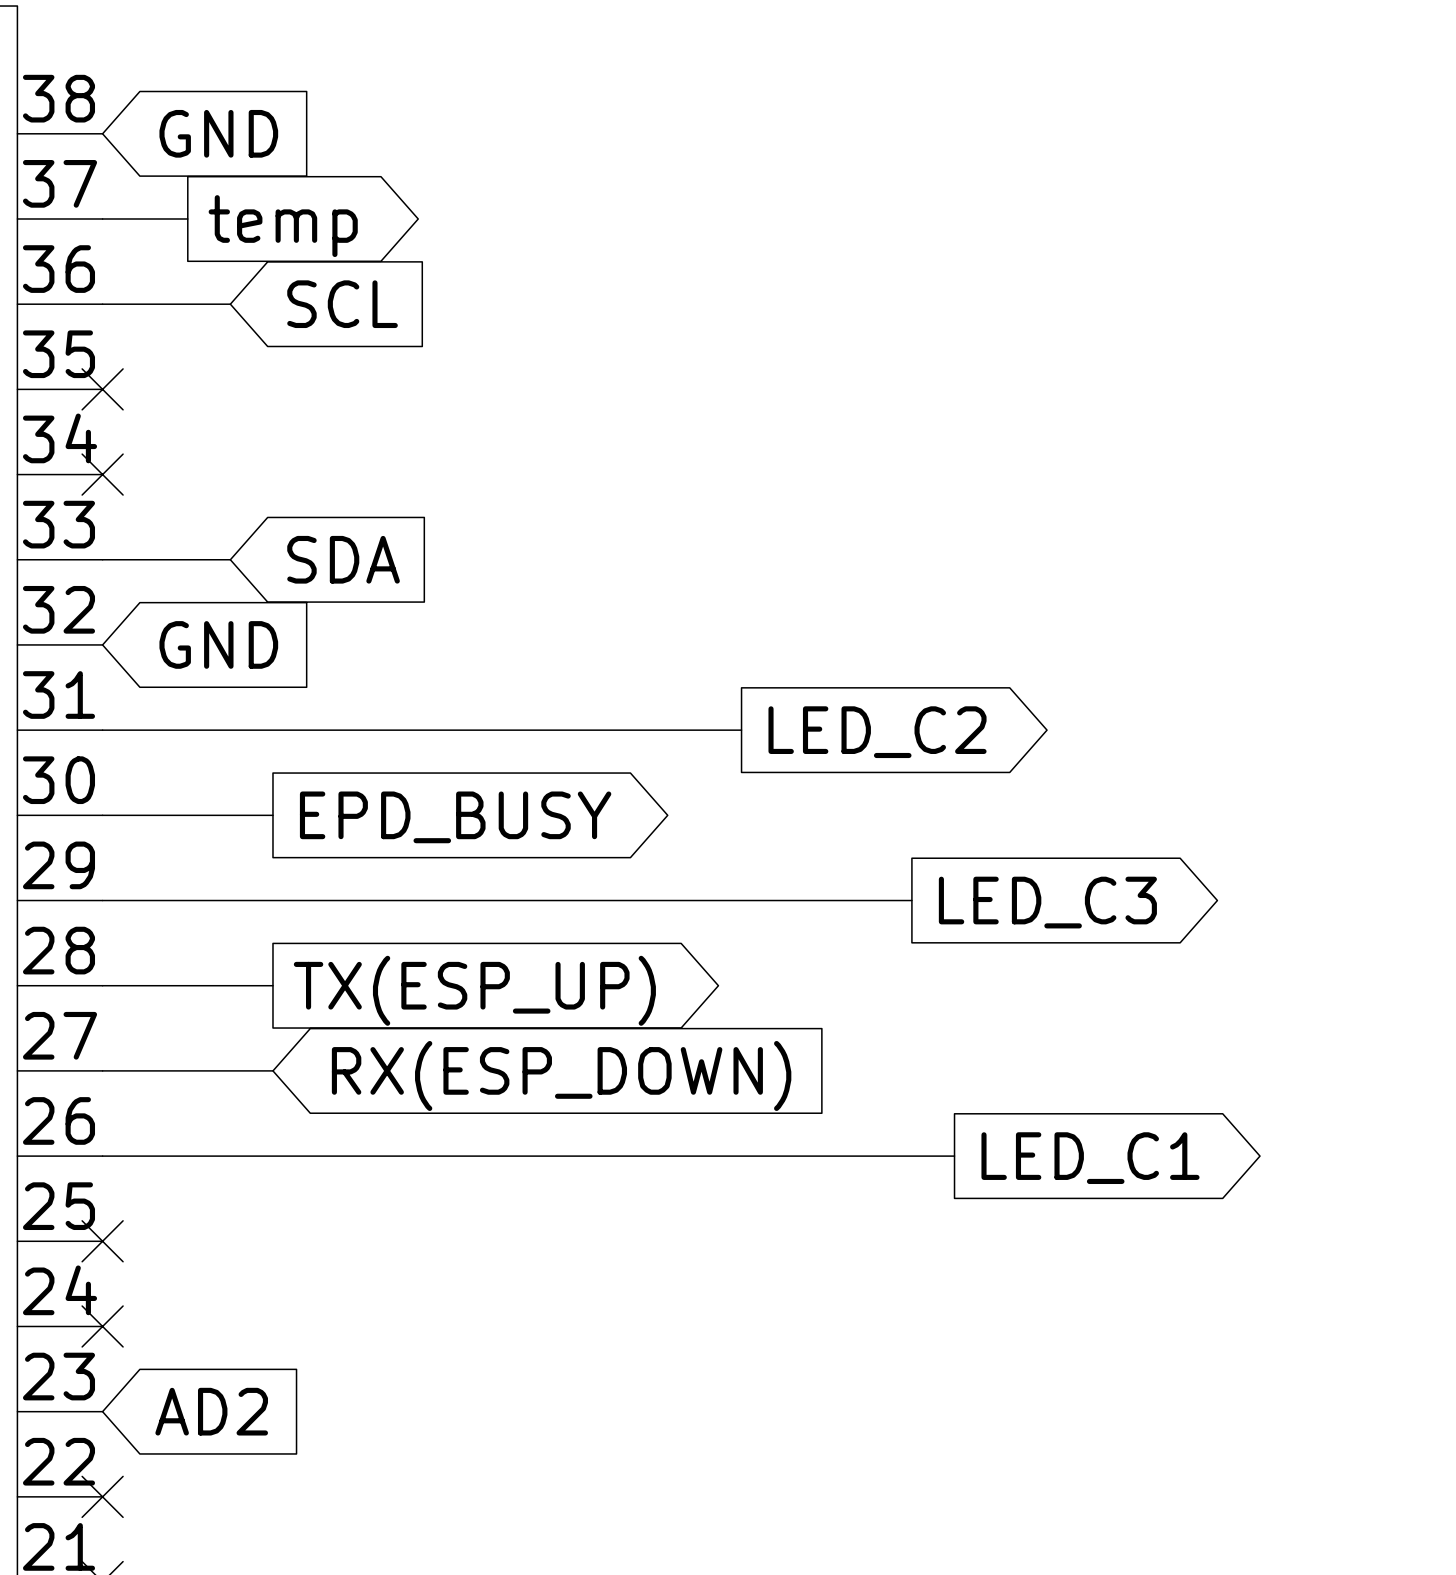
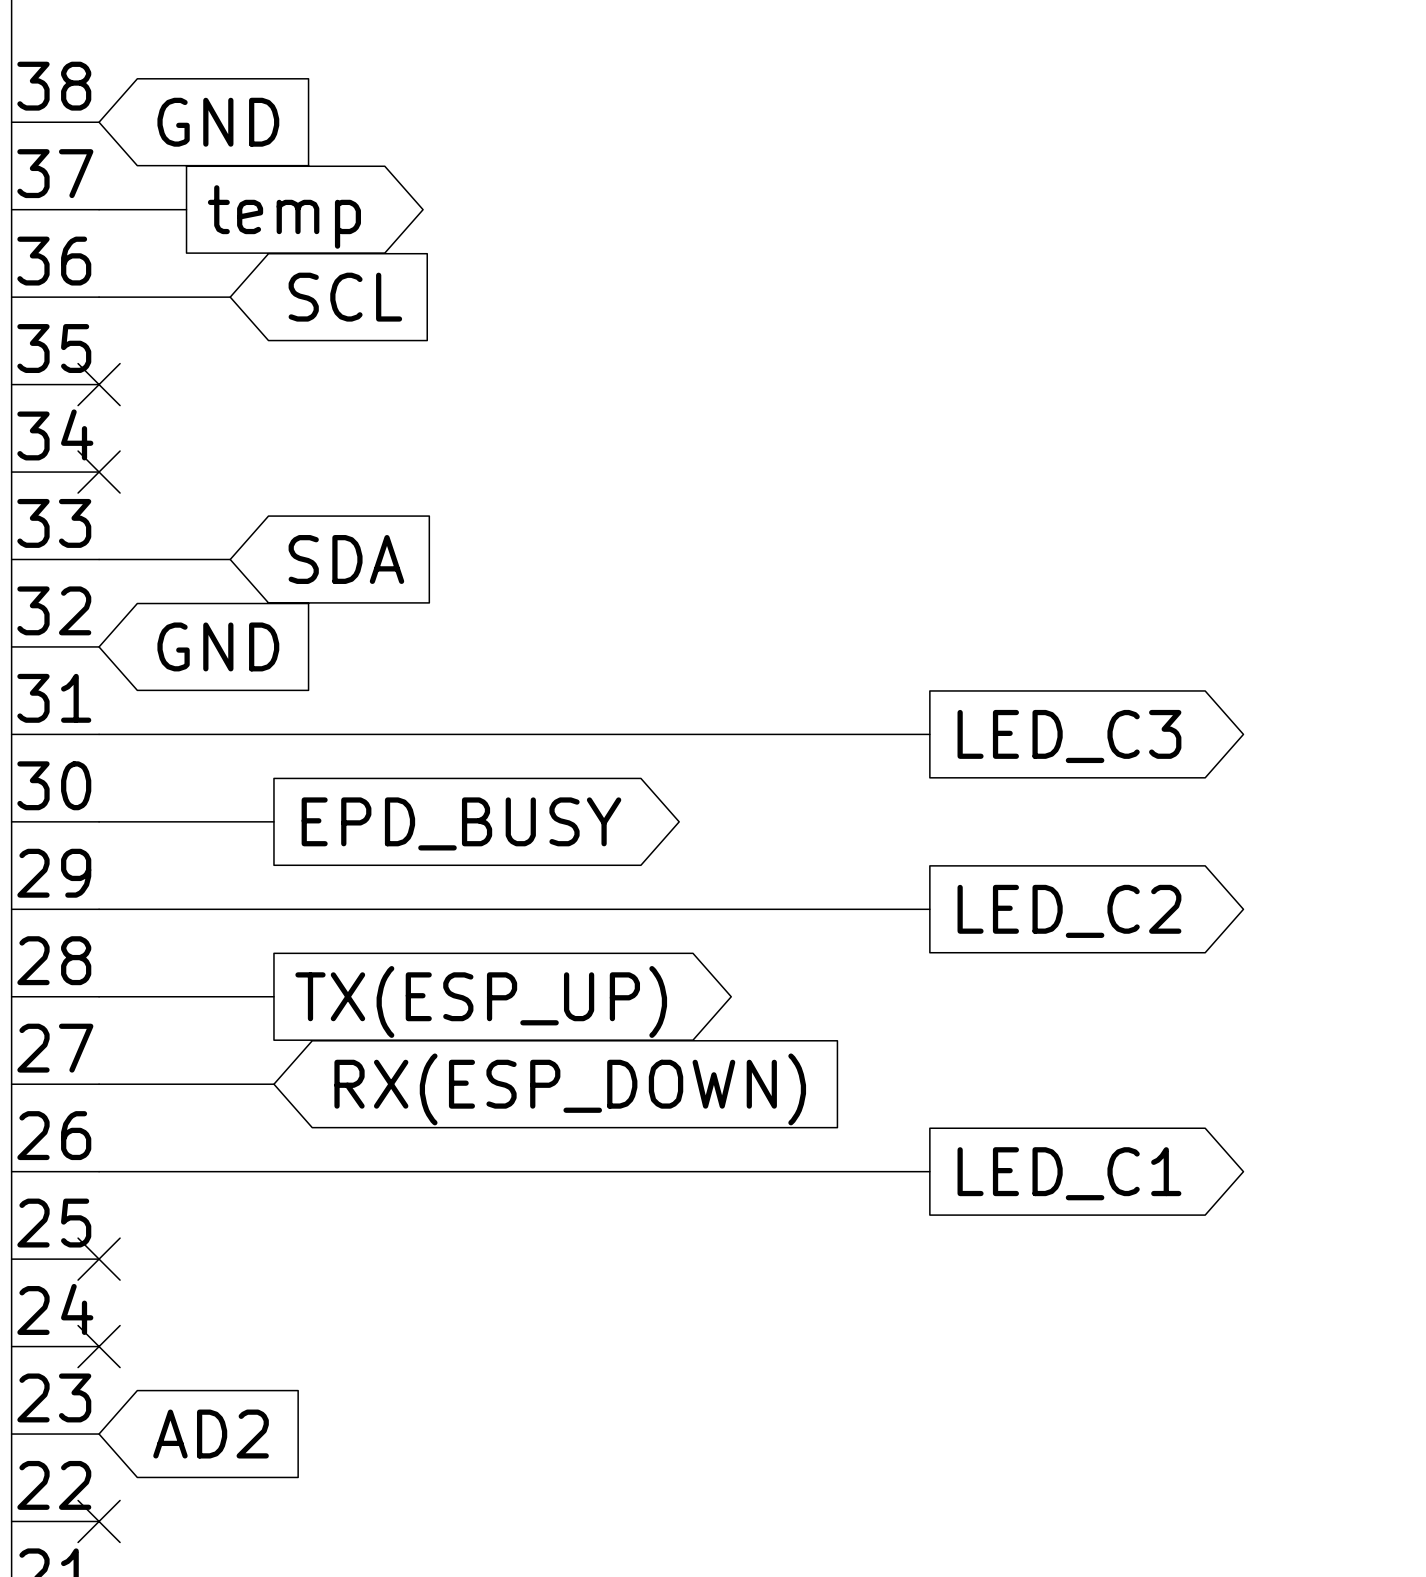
wire: none -> (754, 734) (929, 734)
global label: LED_C2 (877, 732) -> LED_C3 (1069, 736)
global label: LED_C3 (1047, 902) -> LED_C2 (1069, 911)
wire: (911, 1156) (954, 1156) -> none
global label position: LED_C1 (1090, 1158) -> LED_C1 (1069, 1173)

